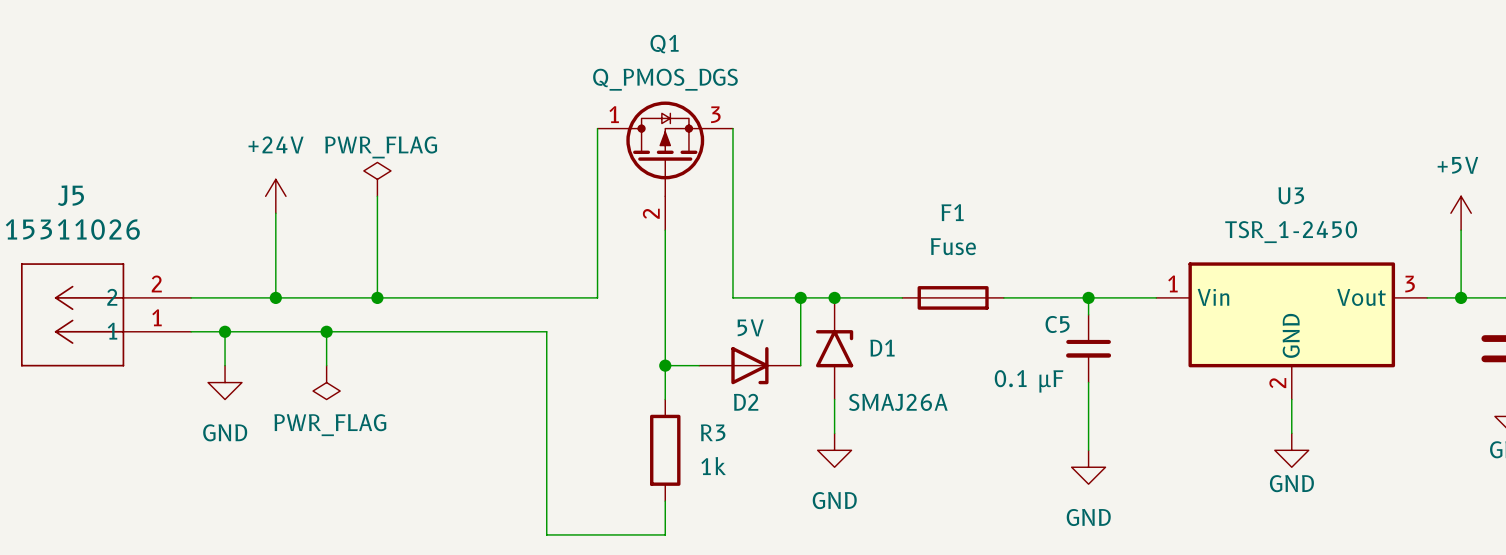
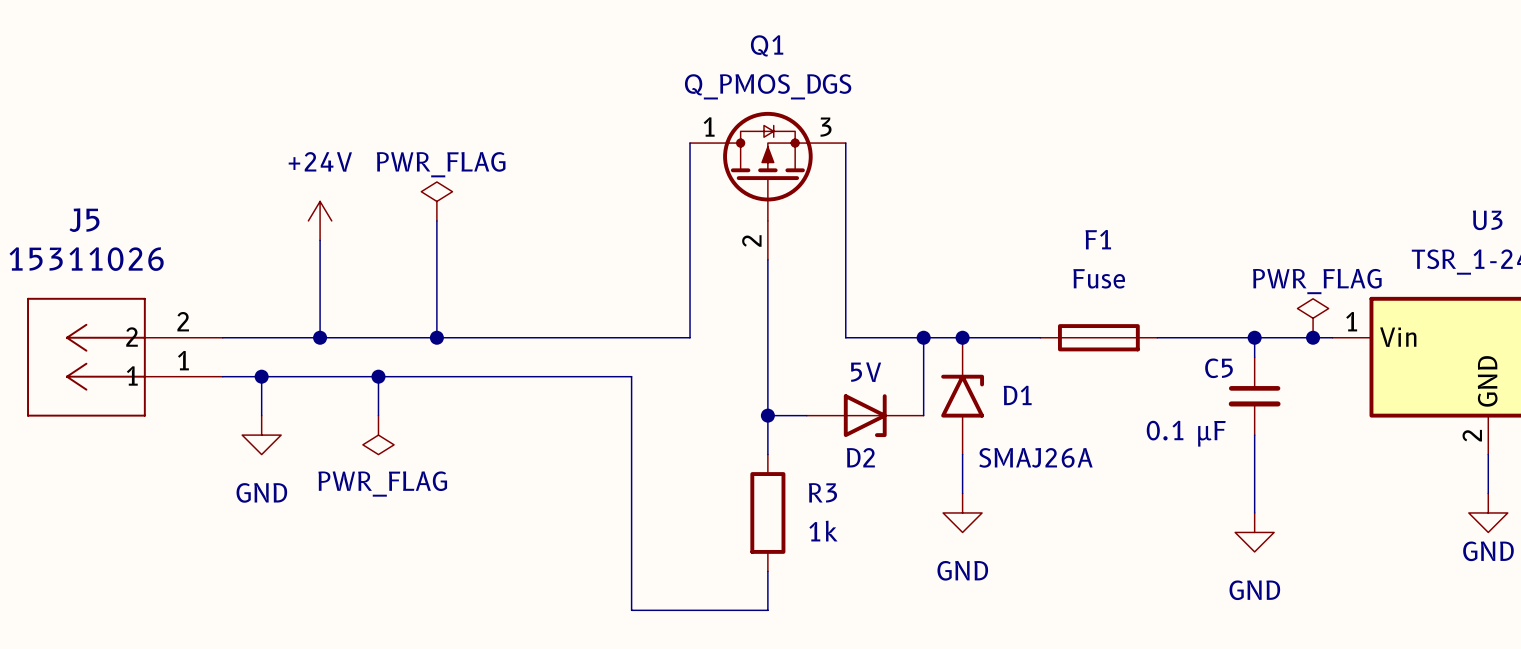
power symbol: none -> PWR_FLAG (1313, 318)
junction: none -> (1313, 337)

